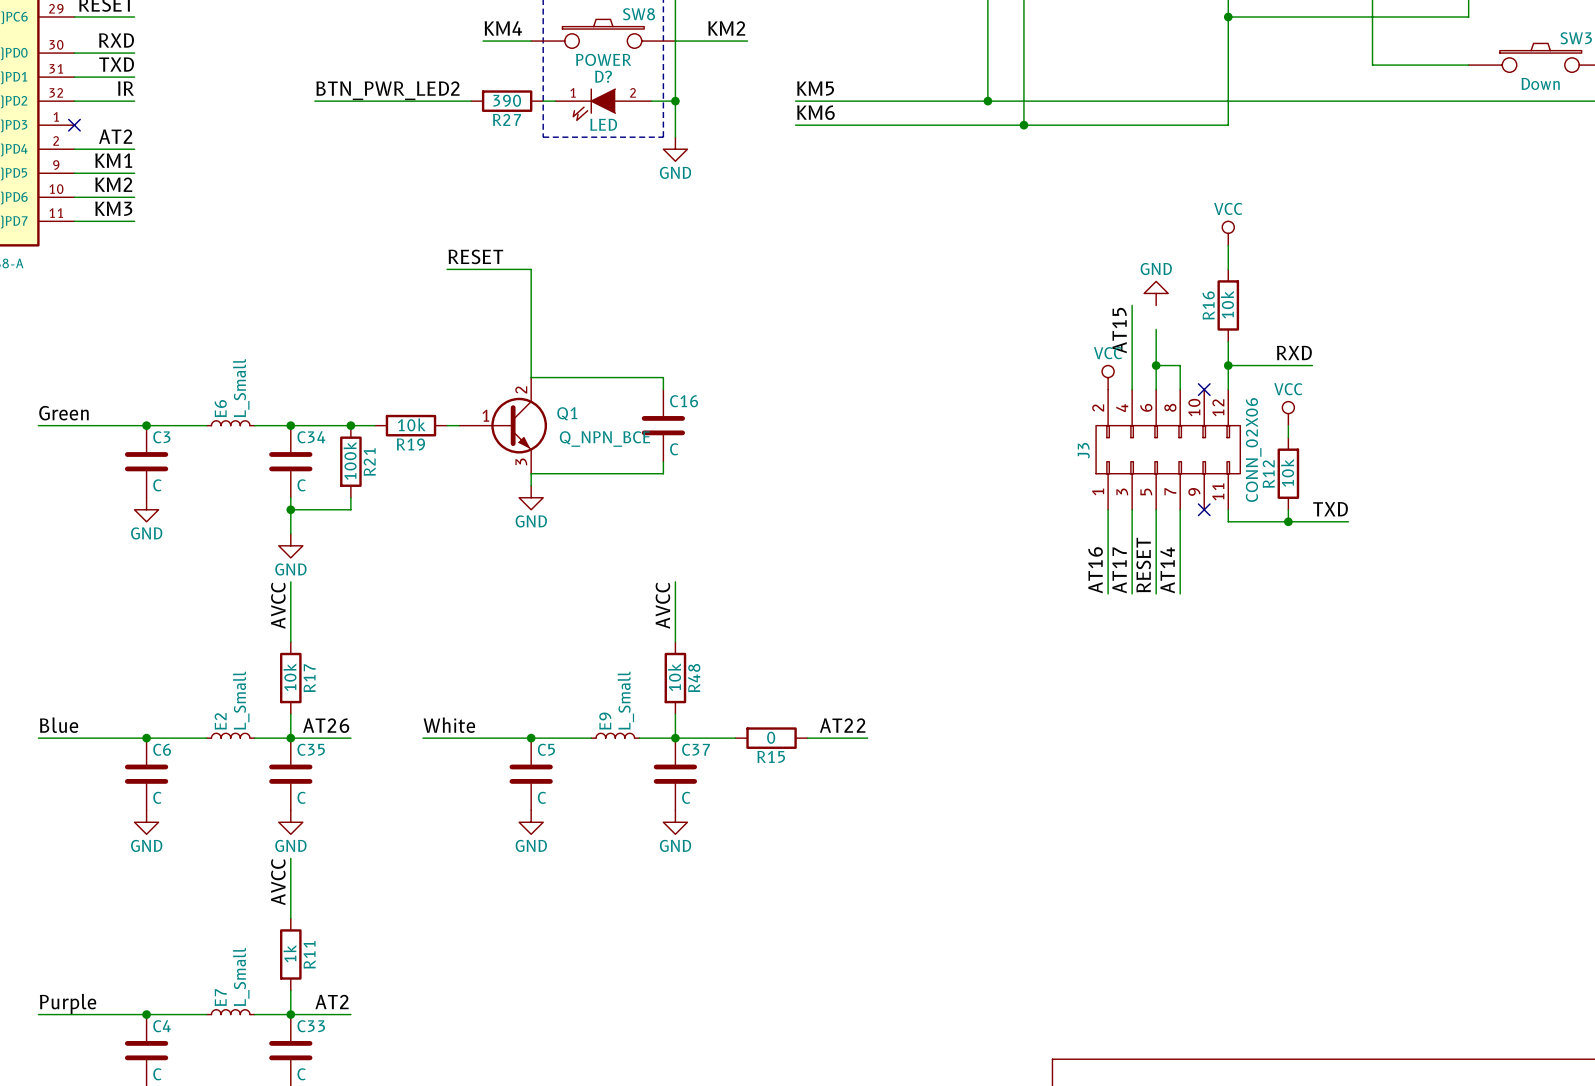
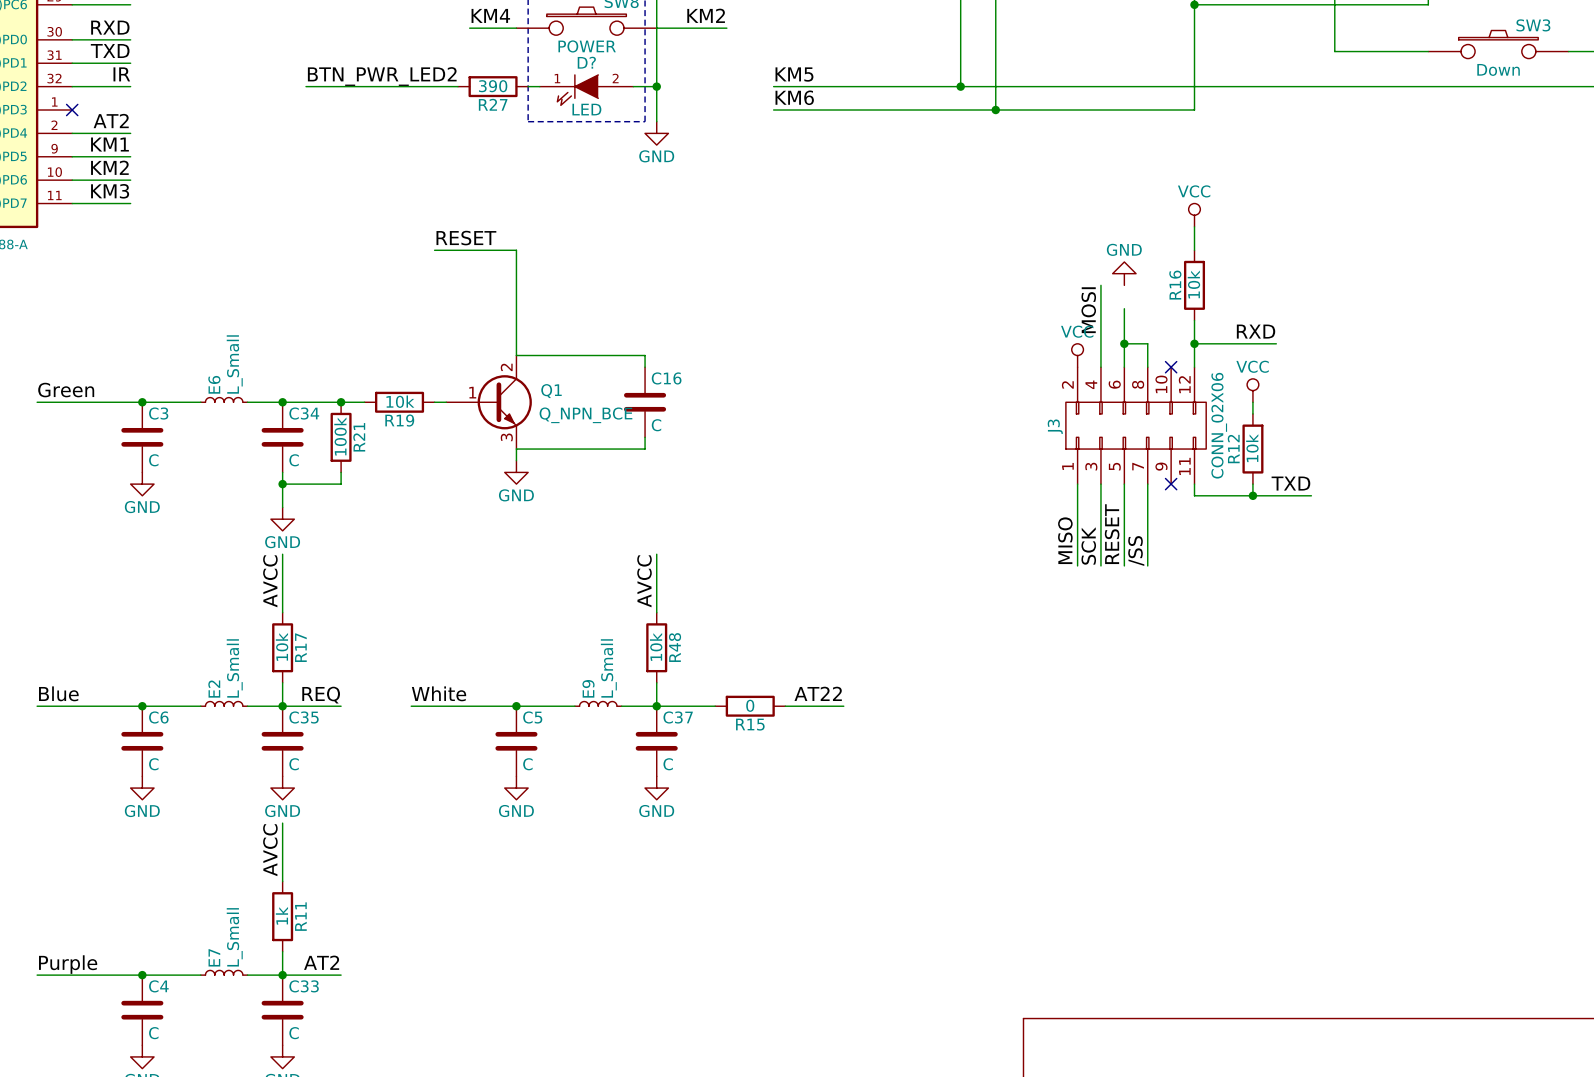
label: AT15 (1119, 330) -> MOSI (1088, 310)
label: AT16 (1095, 570) -> MISO (1065, 540)
label: AT17 (1119, 570) -> SCK (1088, 545)
label: AT14 (1167, 570) -> /SS (1136, 551)
label: AT26 (326, 725) -> REQ (321, 695)

